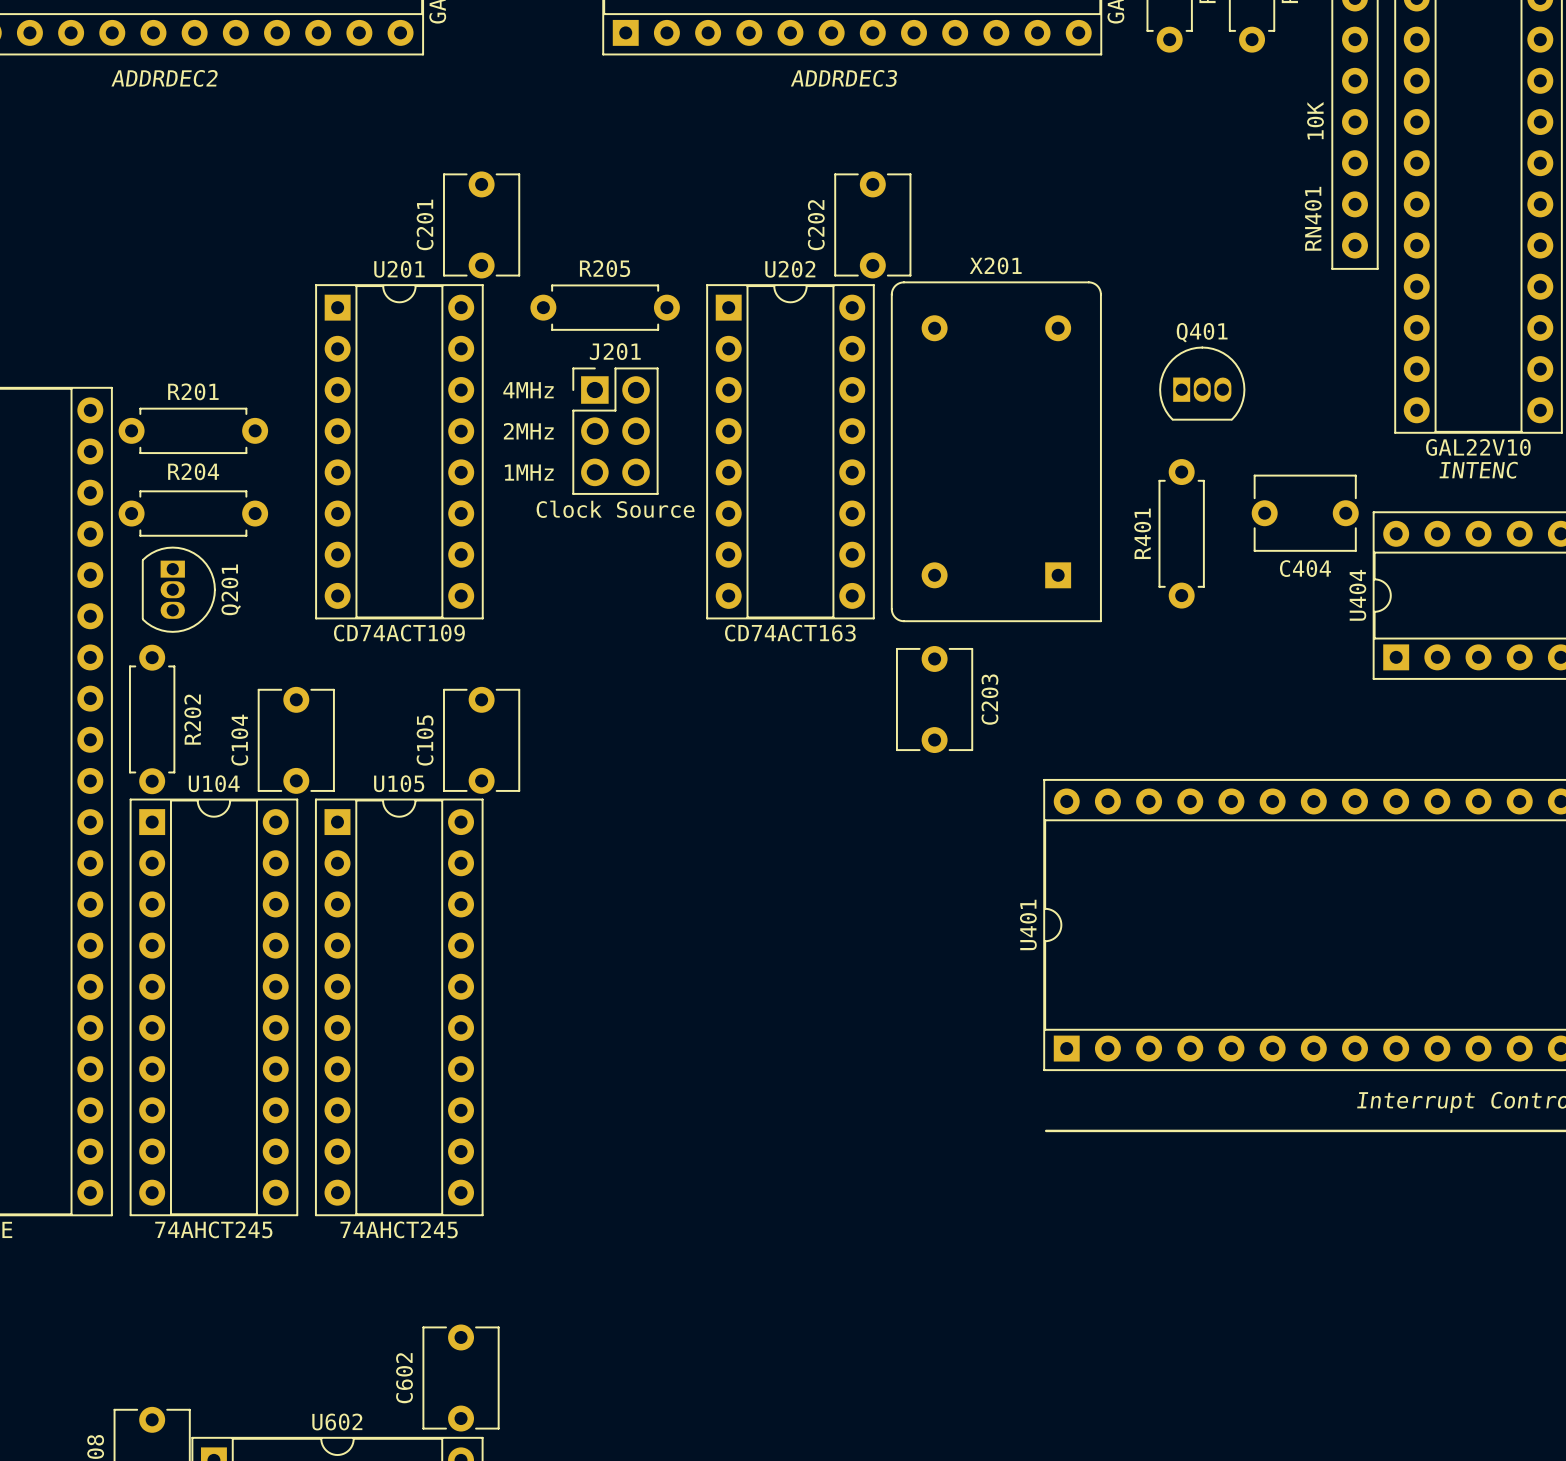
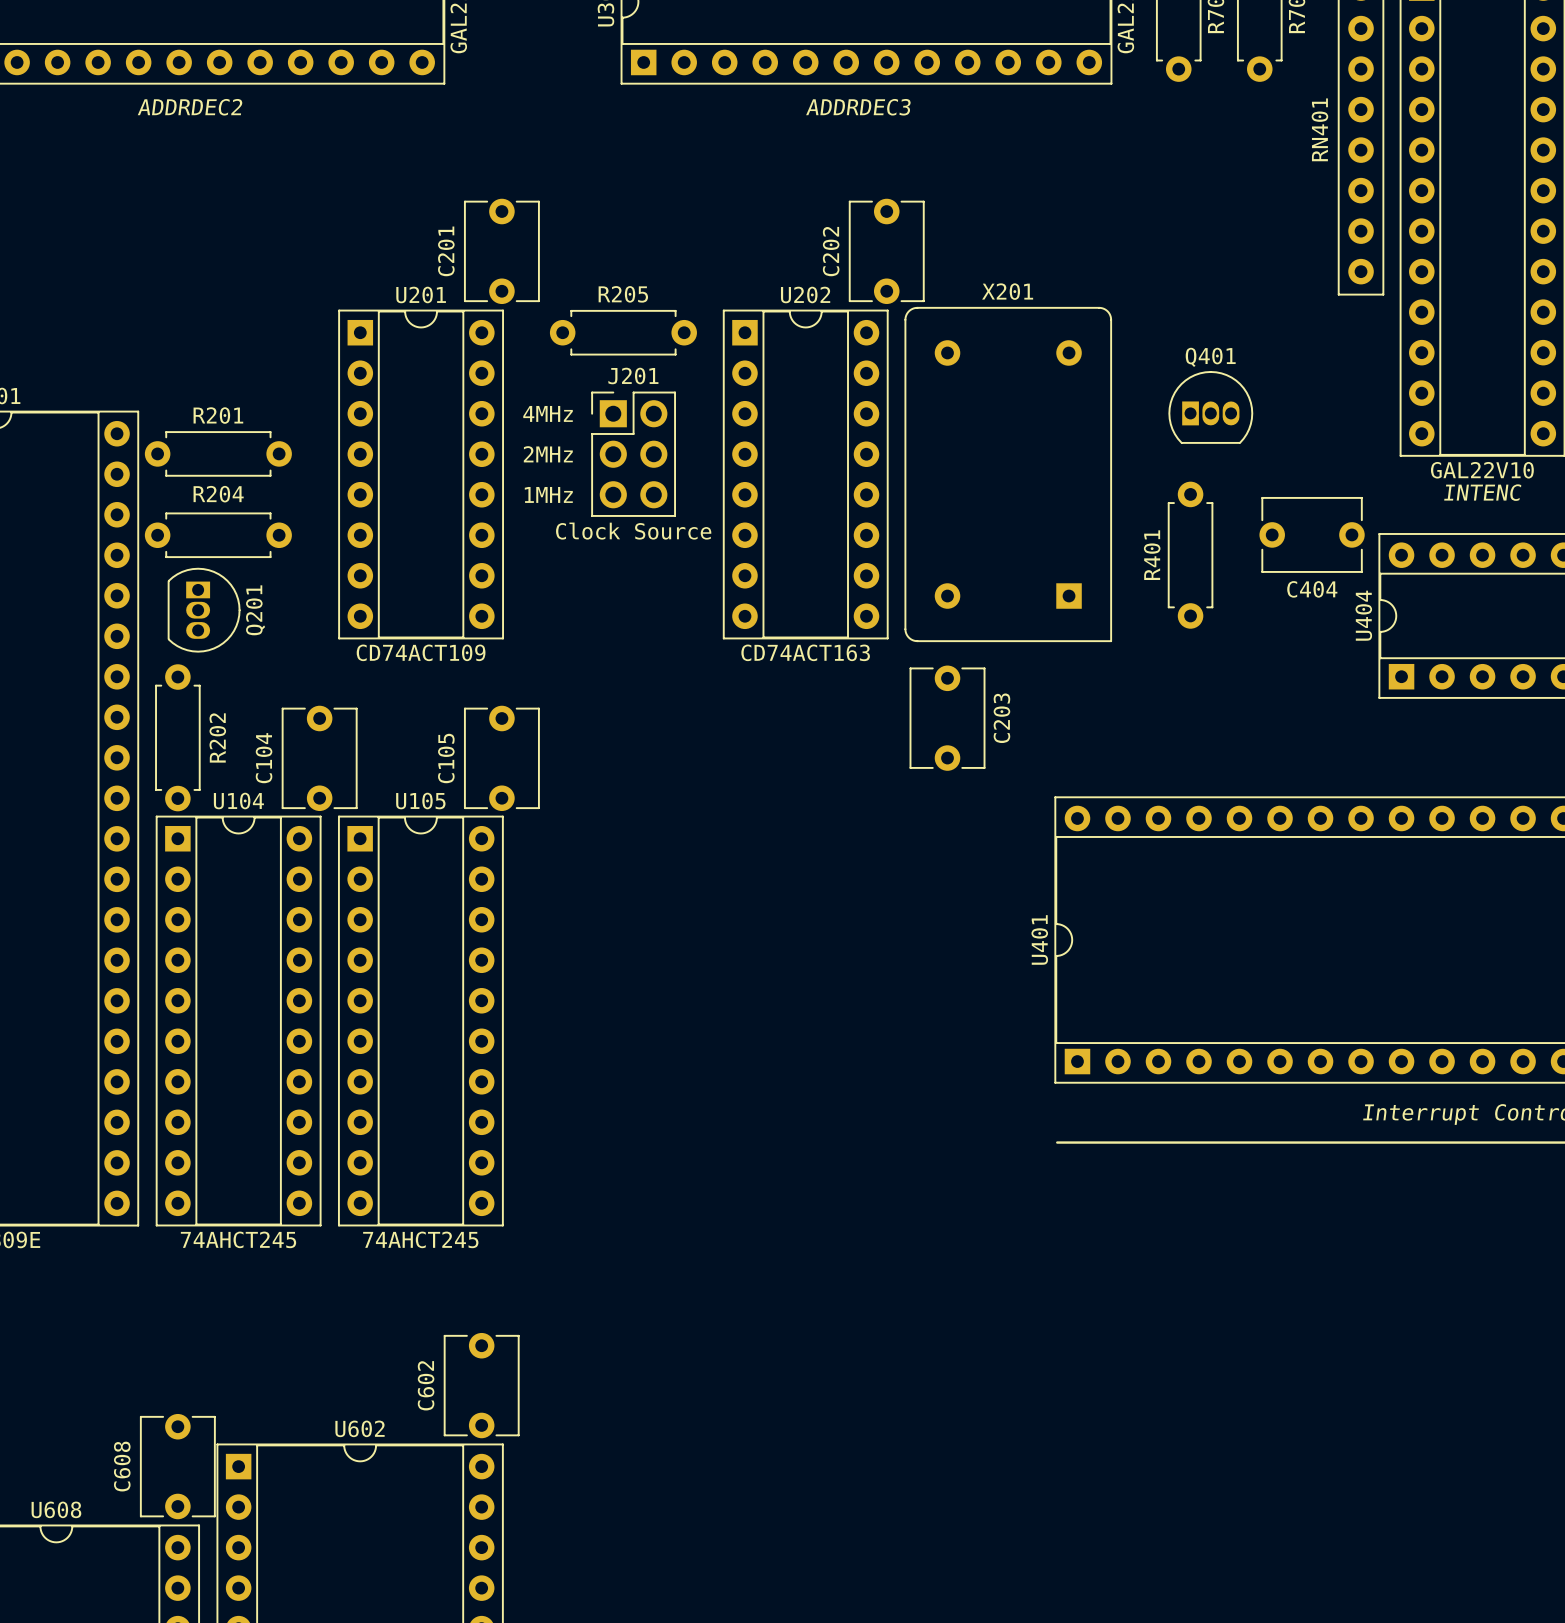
RN401 value: 10K (1315, 120) -> none
RN401 name position: RN401 (1313, 218) -> RN401 (1319, 129)

